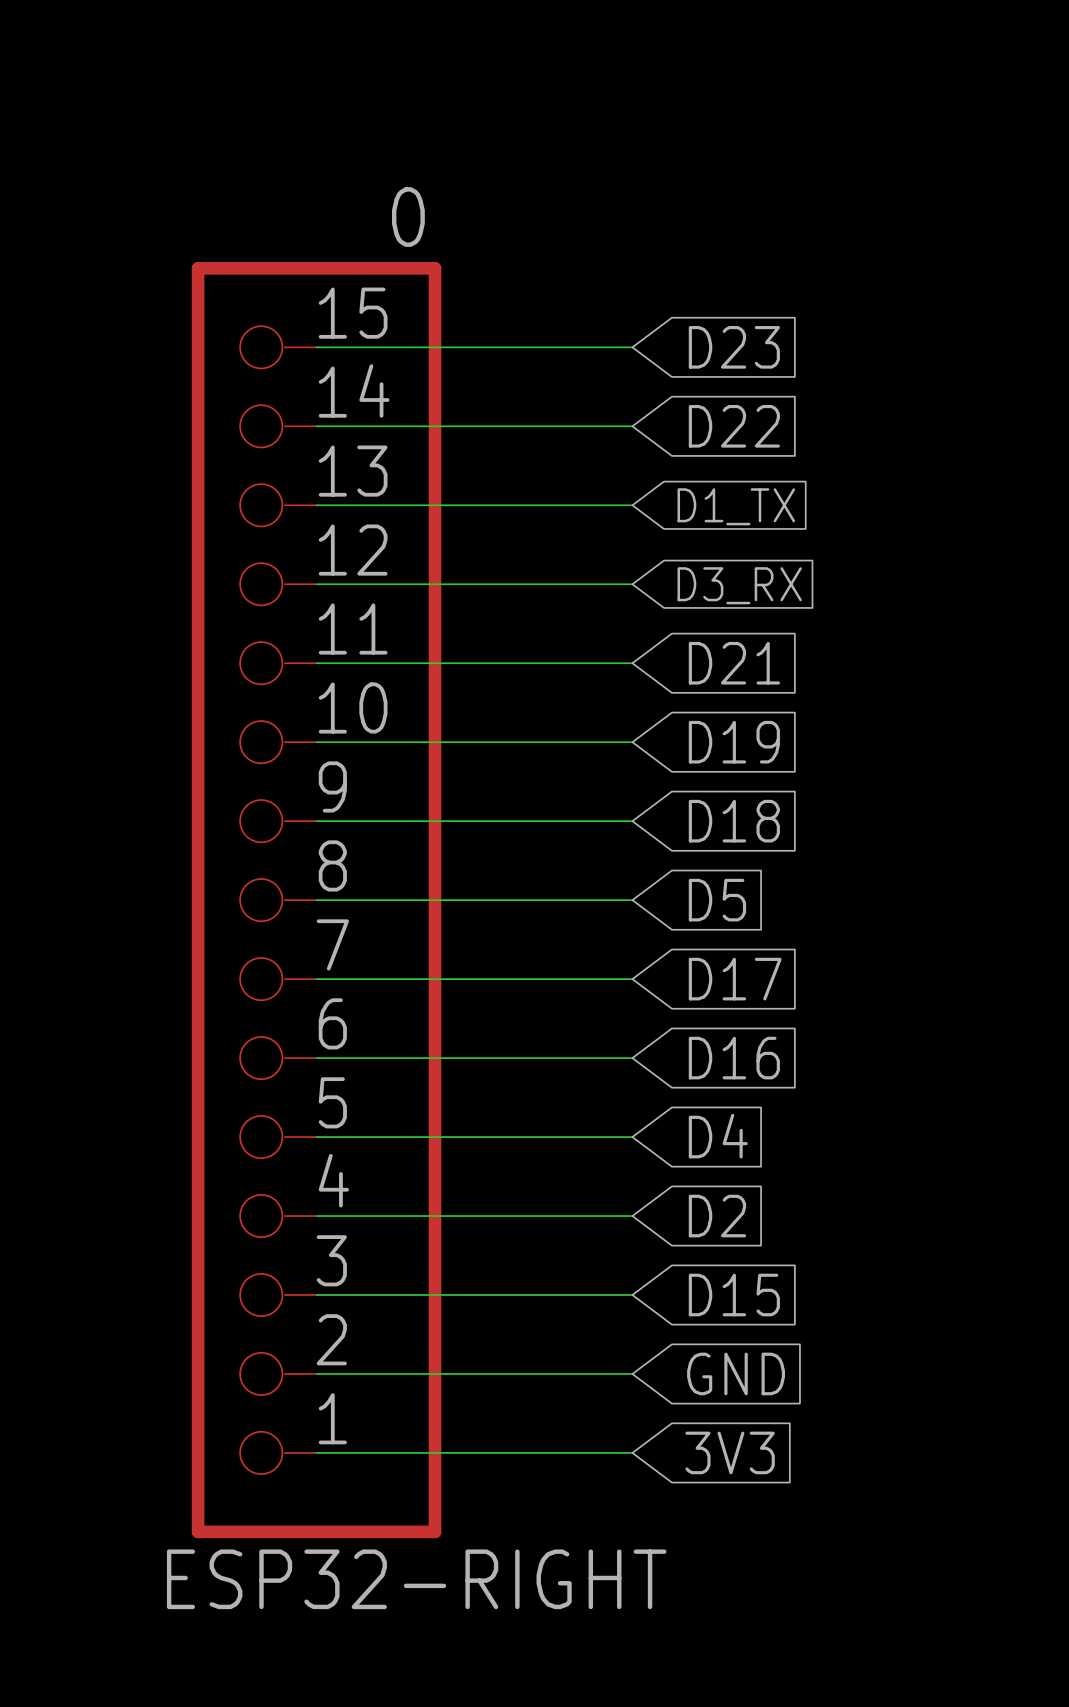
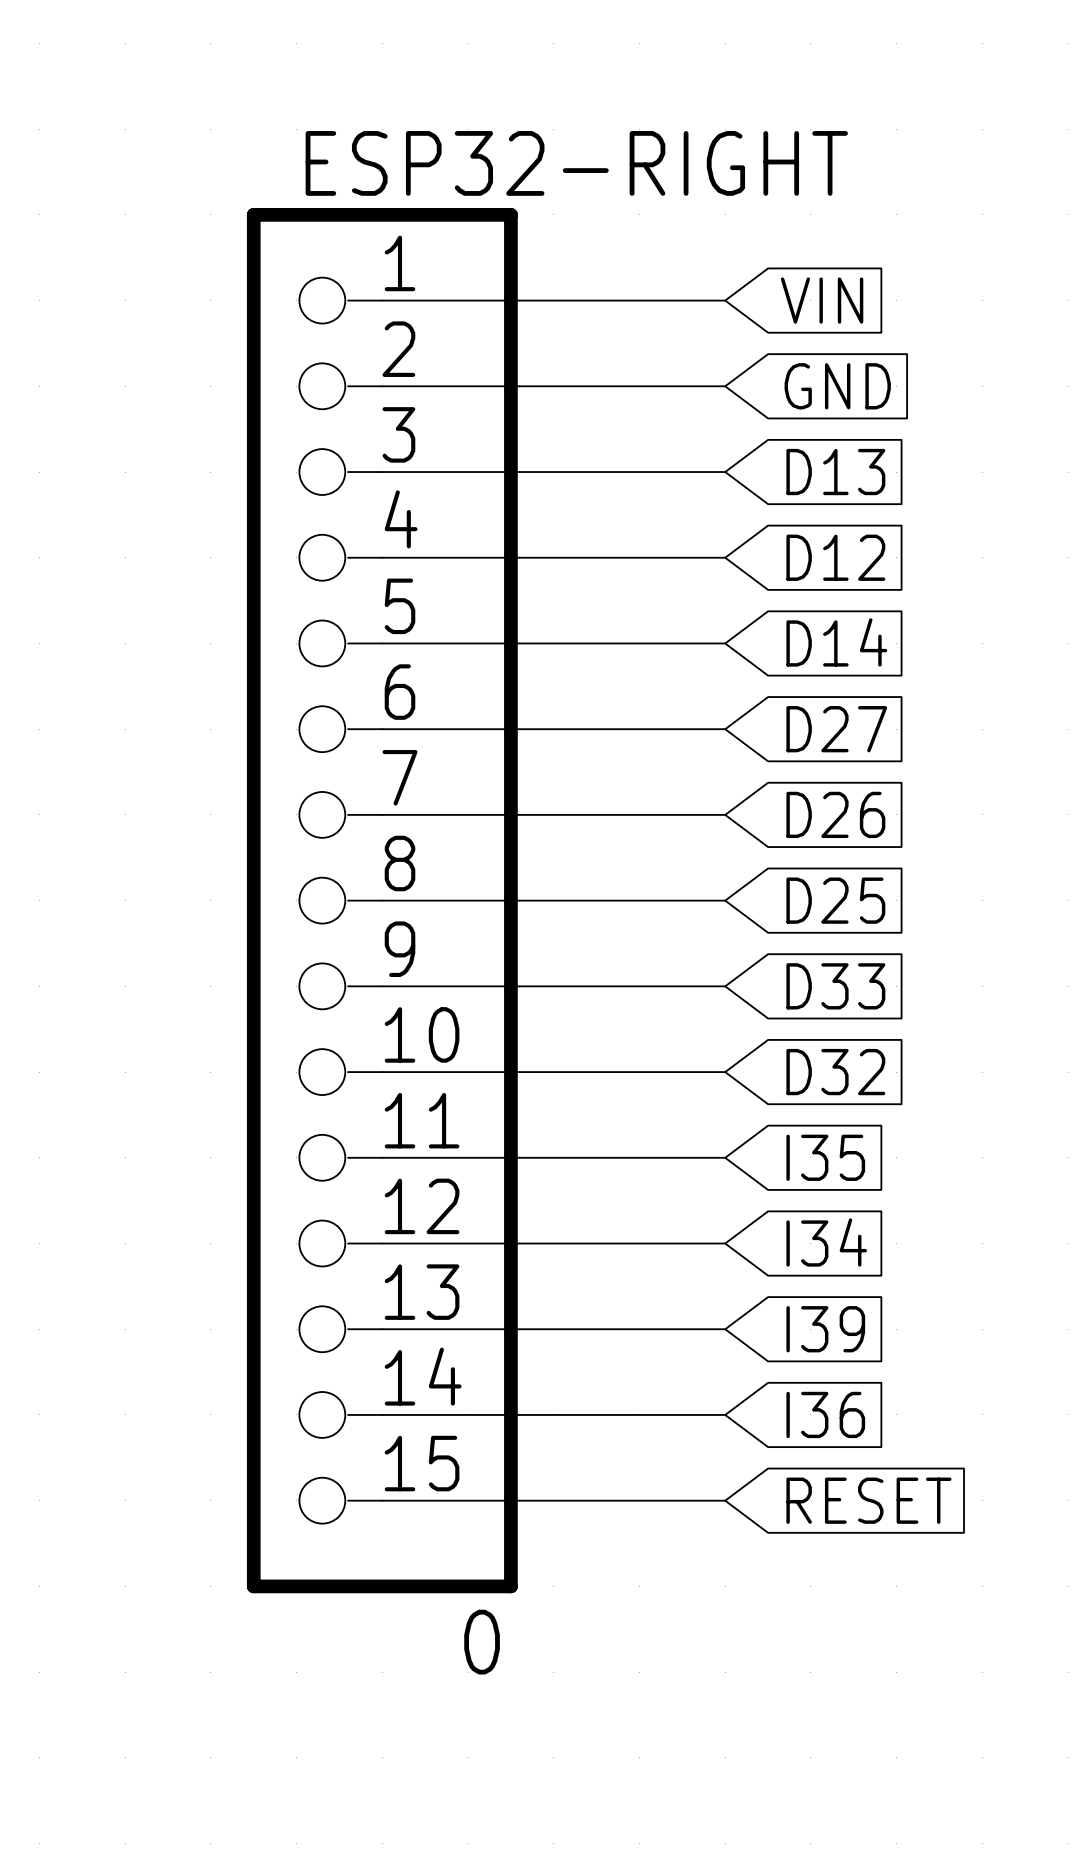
global label: D23 (734, 347) -> VIN (822, 300)
global label: D22 (734, 426) -> GND (837, 386)
global label: D1_TX (736, 506) -> D13 (835, 472)
global label: D3_RX (739, 585) -> D12 (835, 557)
global label: D21 (734, 663) -> D14 (836, 642)
global label: D19 (734, 742) -> D27 (836, 729)
global label: D18 (734, 821) -> D26 (835, 814)
ESP32-RIGHT flip: as is (316, 900) -> up-down (382, 900)
global label: D5 (717, 900) -> D25 (835, 900)
global label: D17 (735, 979) -> D33 (835, 986)
global label: D16 (734, 1058) -> D32 (835, 1072)
global label: D4 (718, 1136) -> I35 (825, 1157)
global label: D2 (717, 1216) -> I34 (826, 1242)
global label: D15 (734, 1295) -> I39 (825, 1329)
global label: GND (736, 1373) -> I36 (825, 1414)
global label: 3V3 (730, 1452) -> RESET (868, 1500)
ESP32-RIGHT name position: ESP32-RIGHT (416, 1579) -> ESP32-RIGHT (576, 163)

